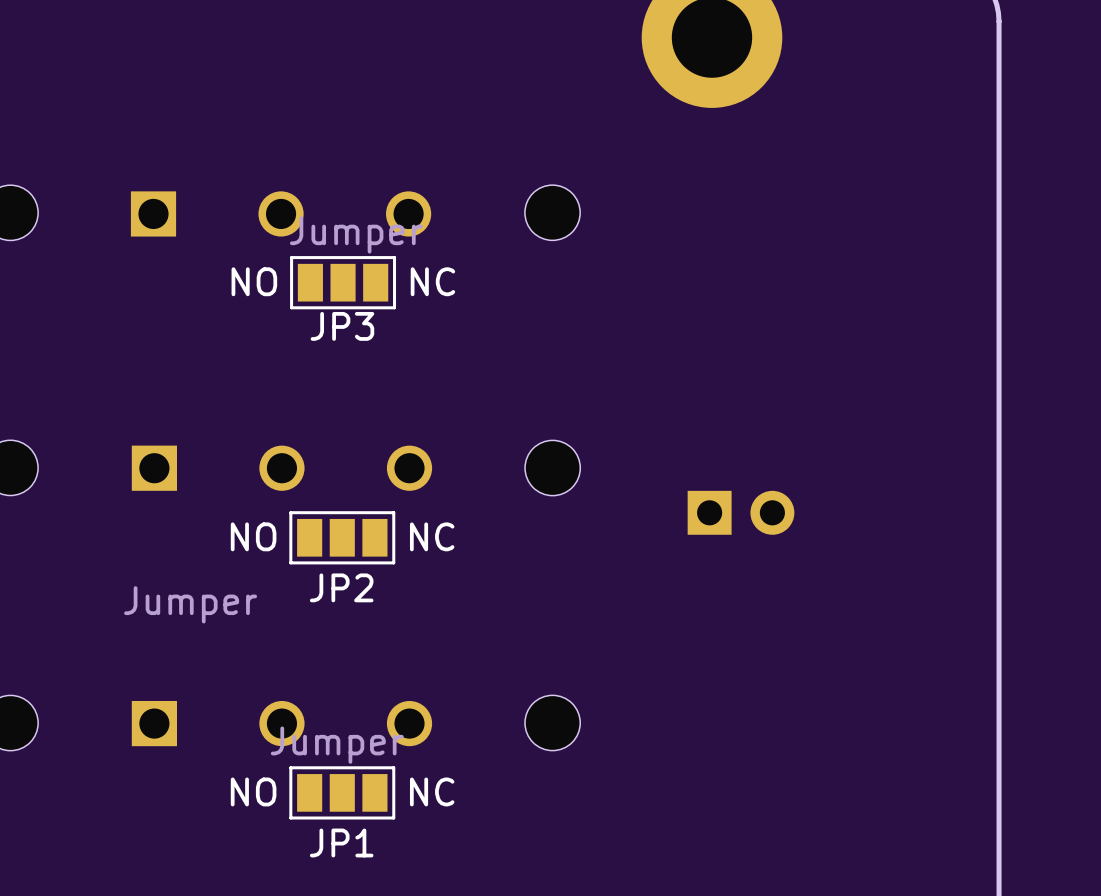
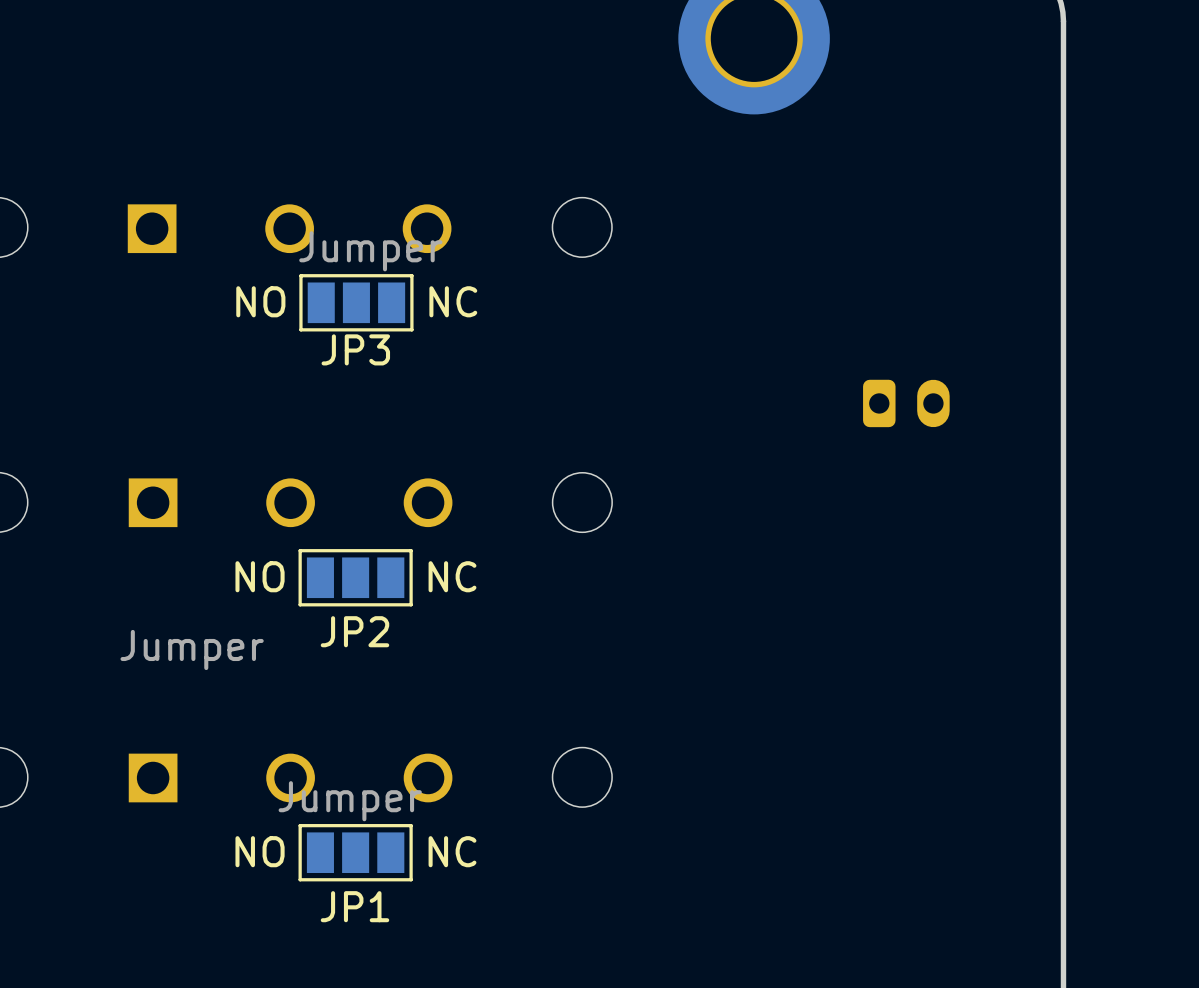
part: none -> (906, 403)
part: (741, 512) -> none

